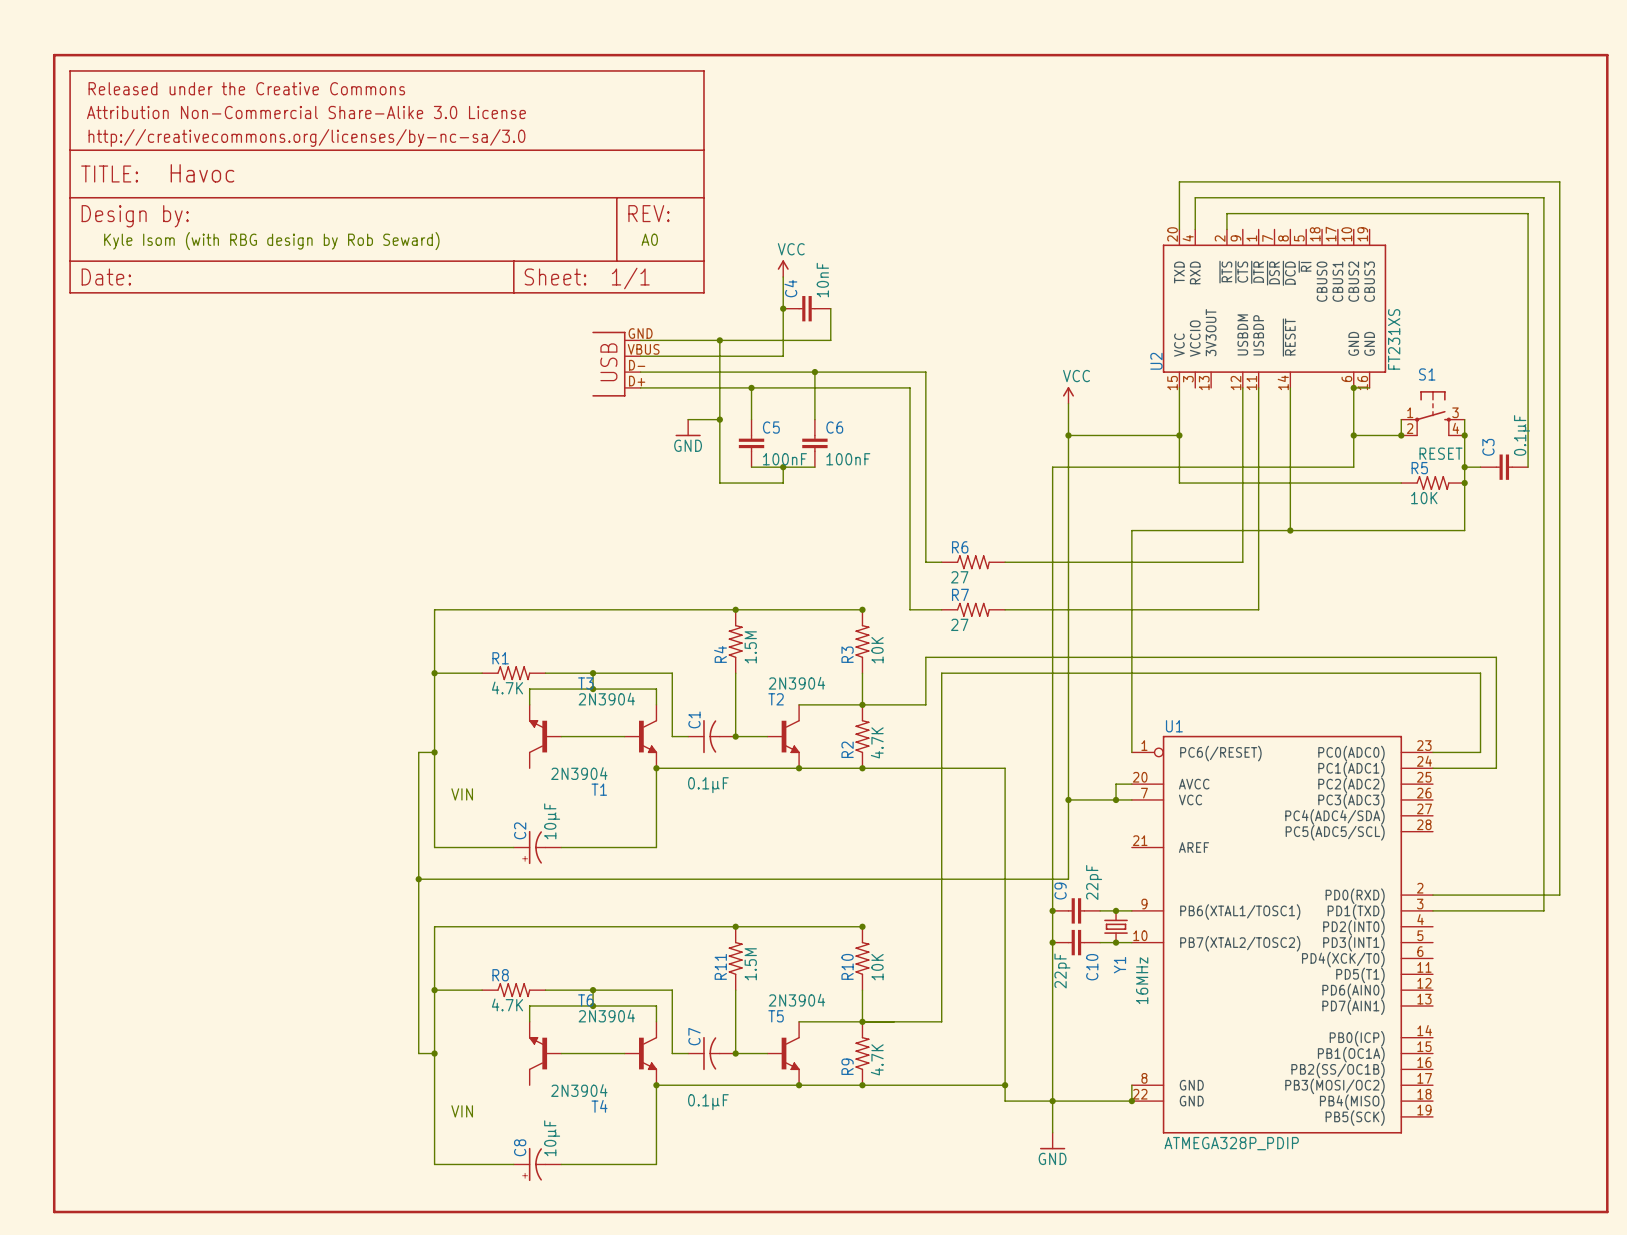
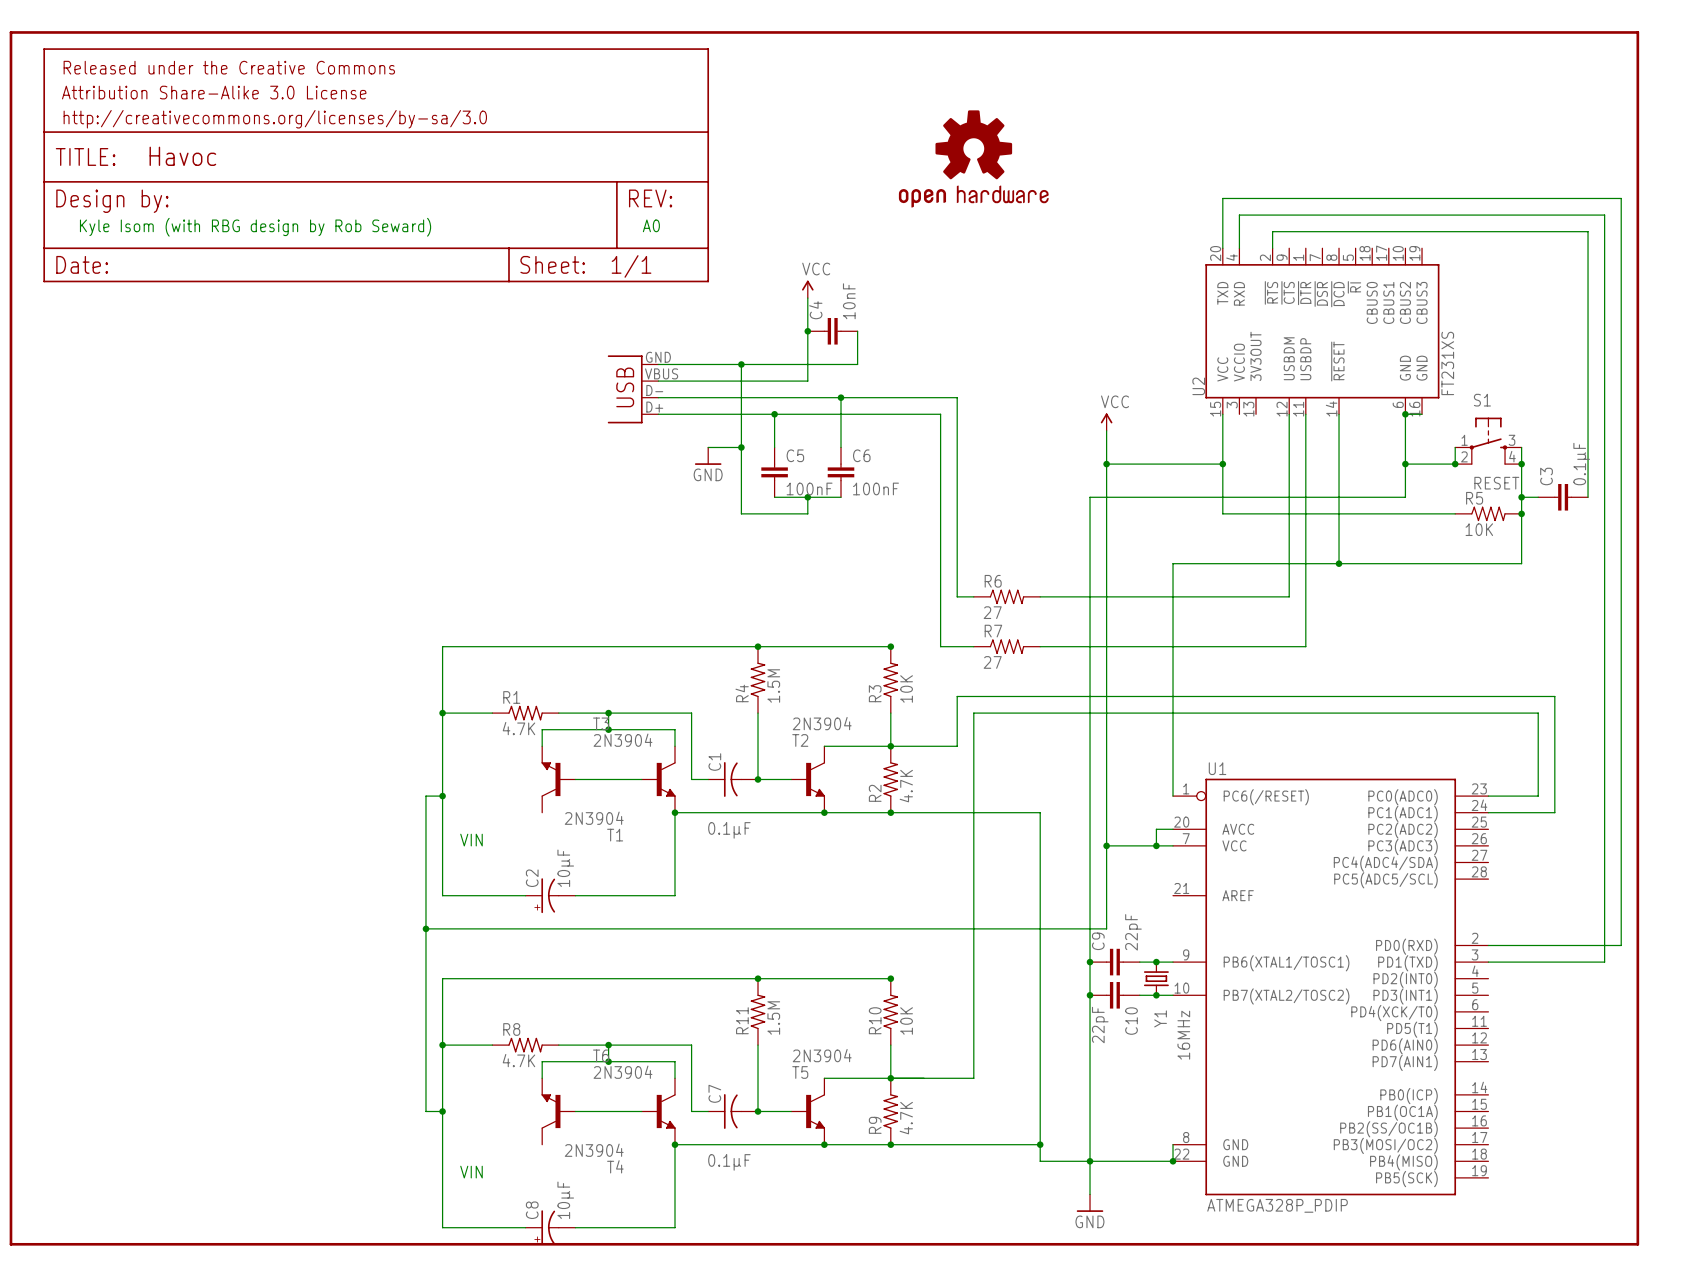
part: none -> (973, 158)
part: none -> (376, 165)
part: (387, 181) -> none
text position: A0 (649, 239) -> A0 (651, 225)
text position: Kyle Isom (with RBG design by Rob Seward) (271, 241) -> Kyle Isom (with RBG design by Rob Seward) (255, 227)
part position: (830, 633) -> (824, 638)

